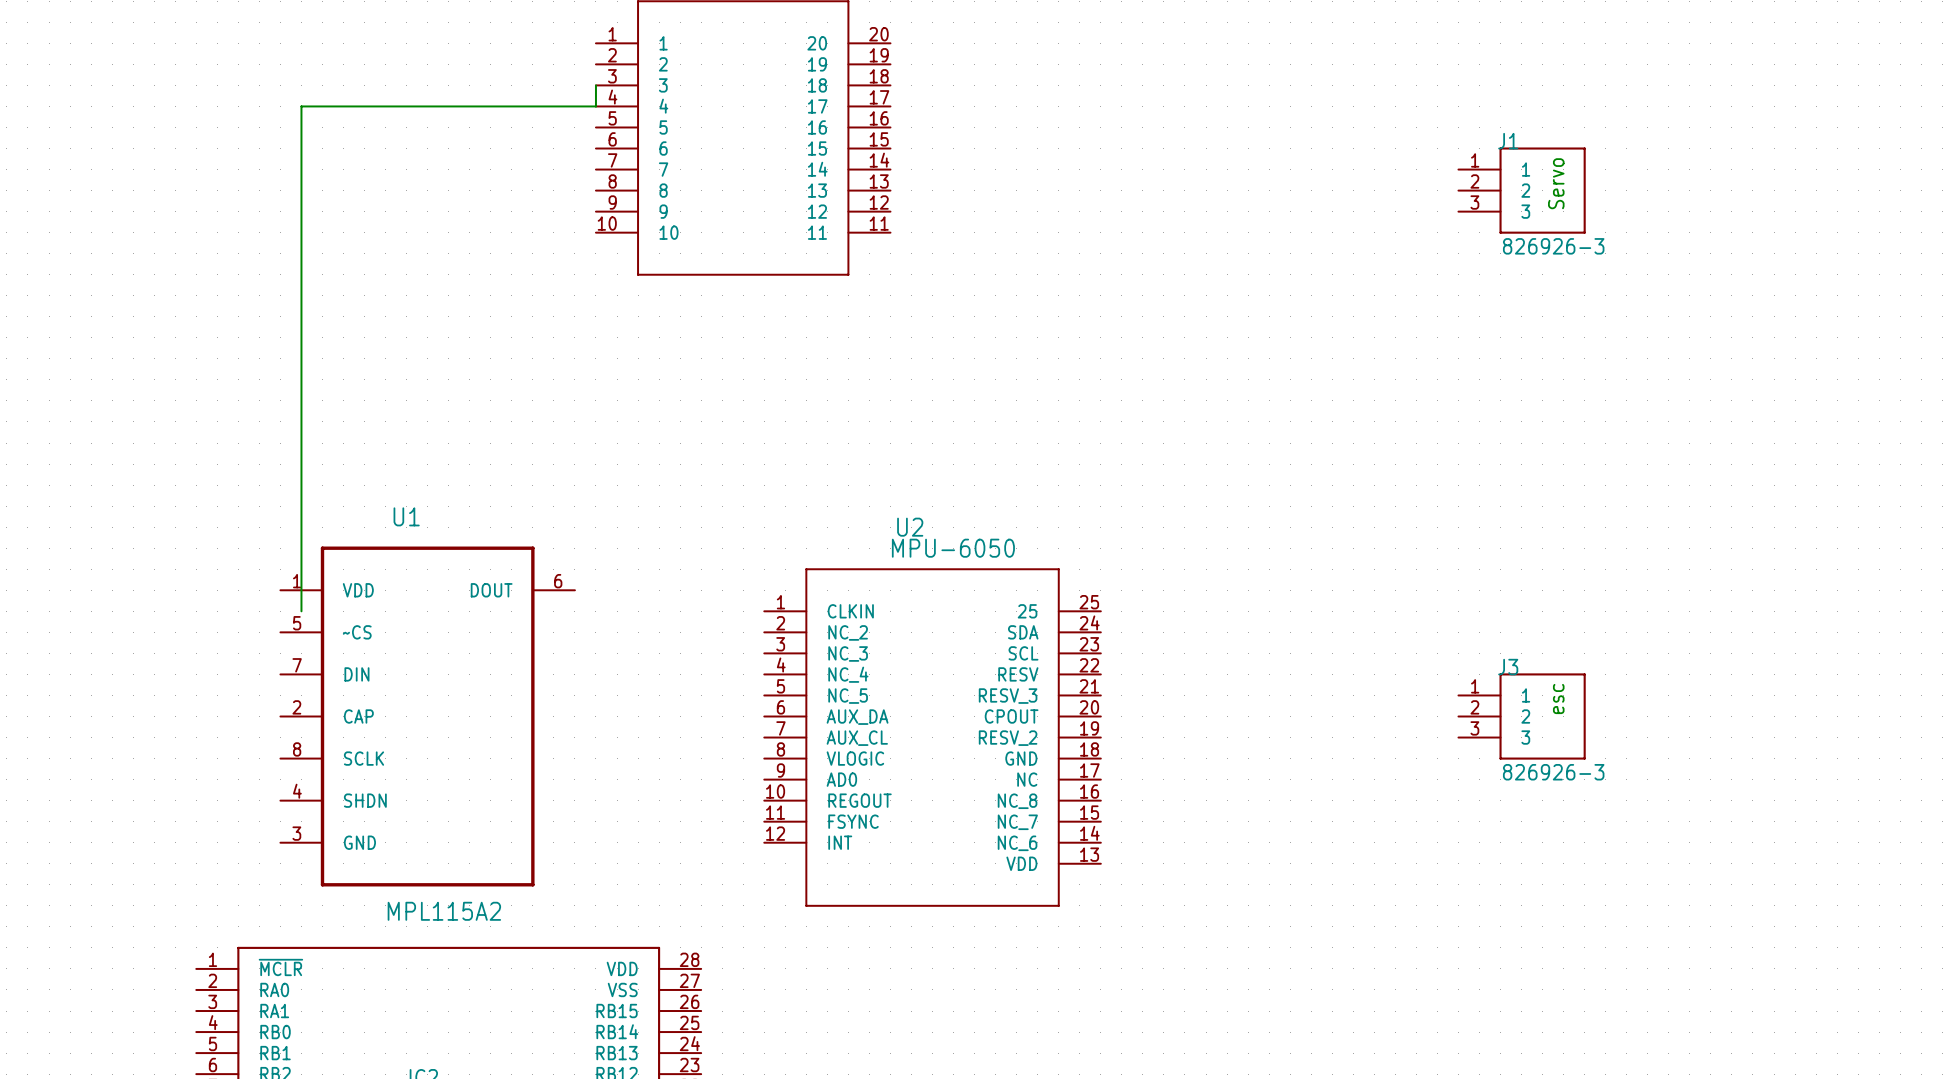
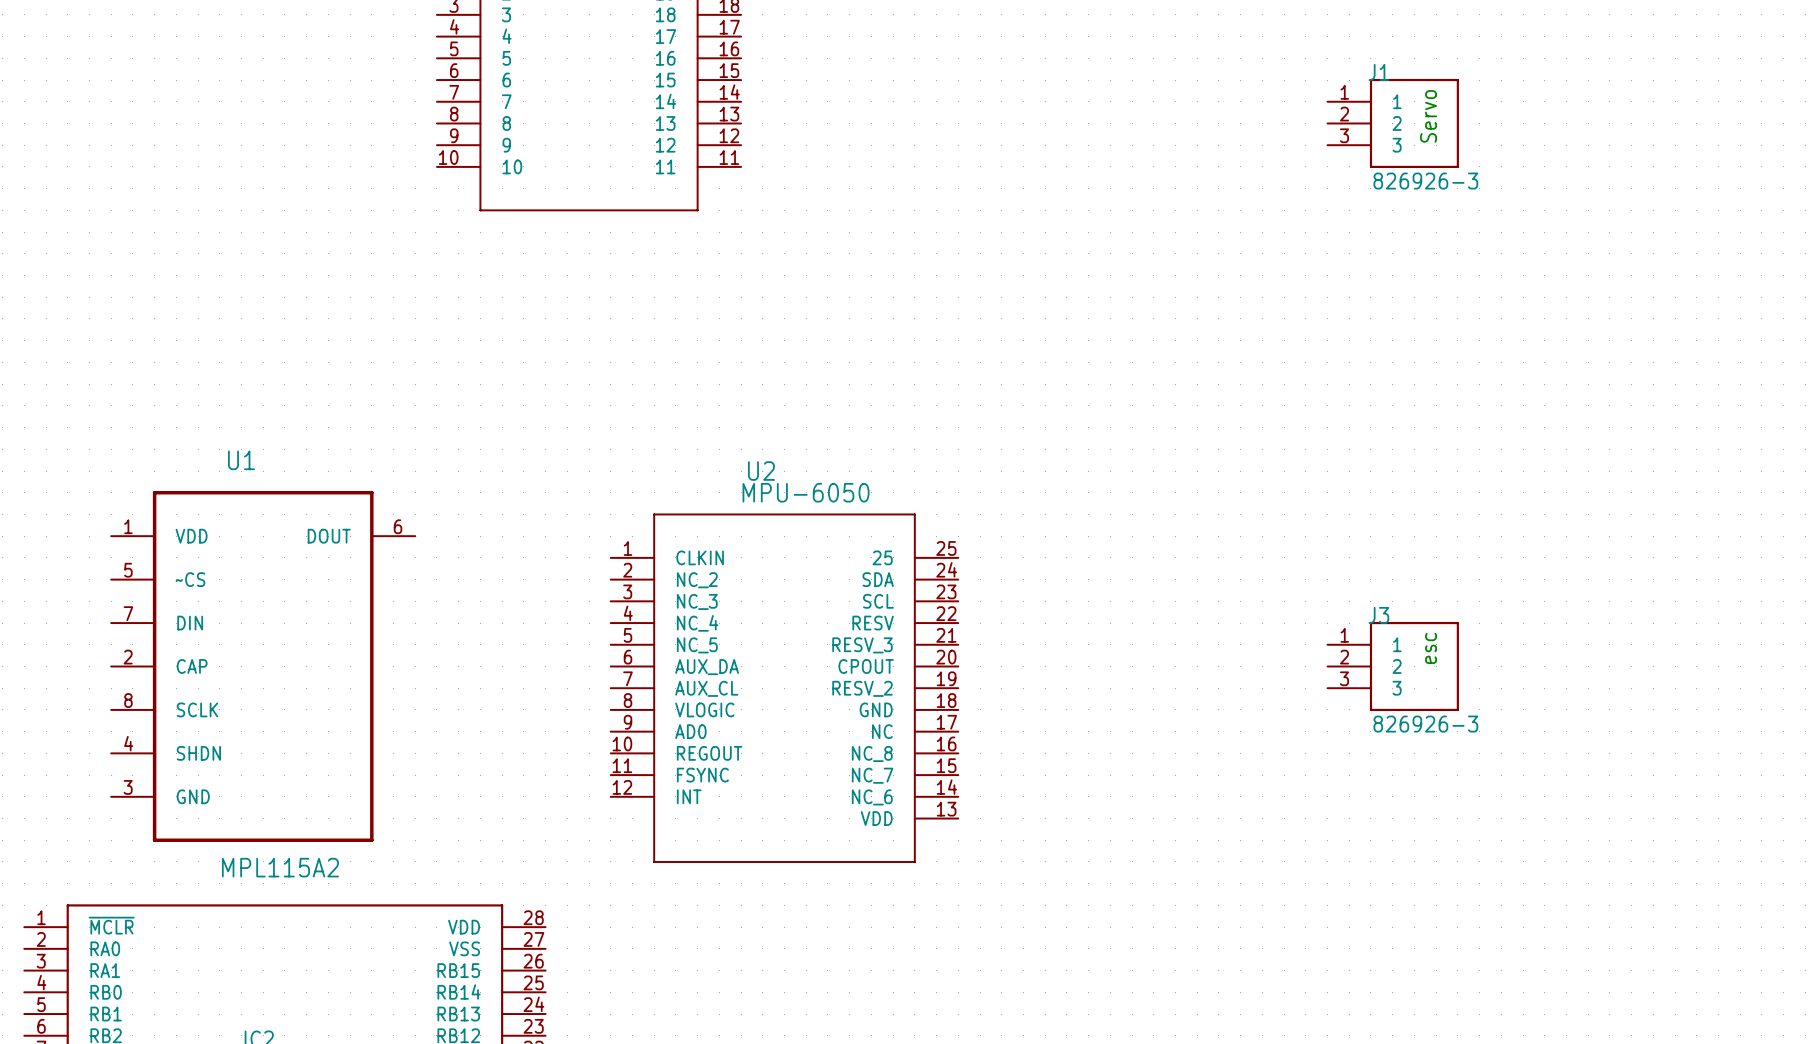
wire: (595, 85) (595, 106) (301, 106) (301, 611) -> none

